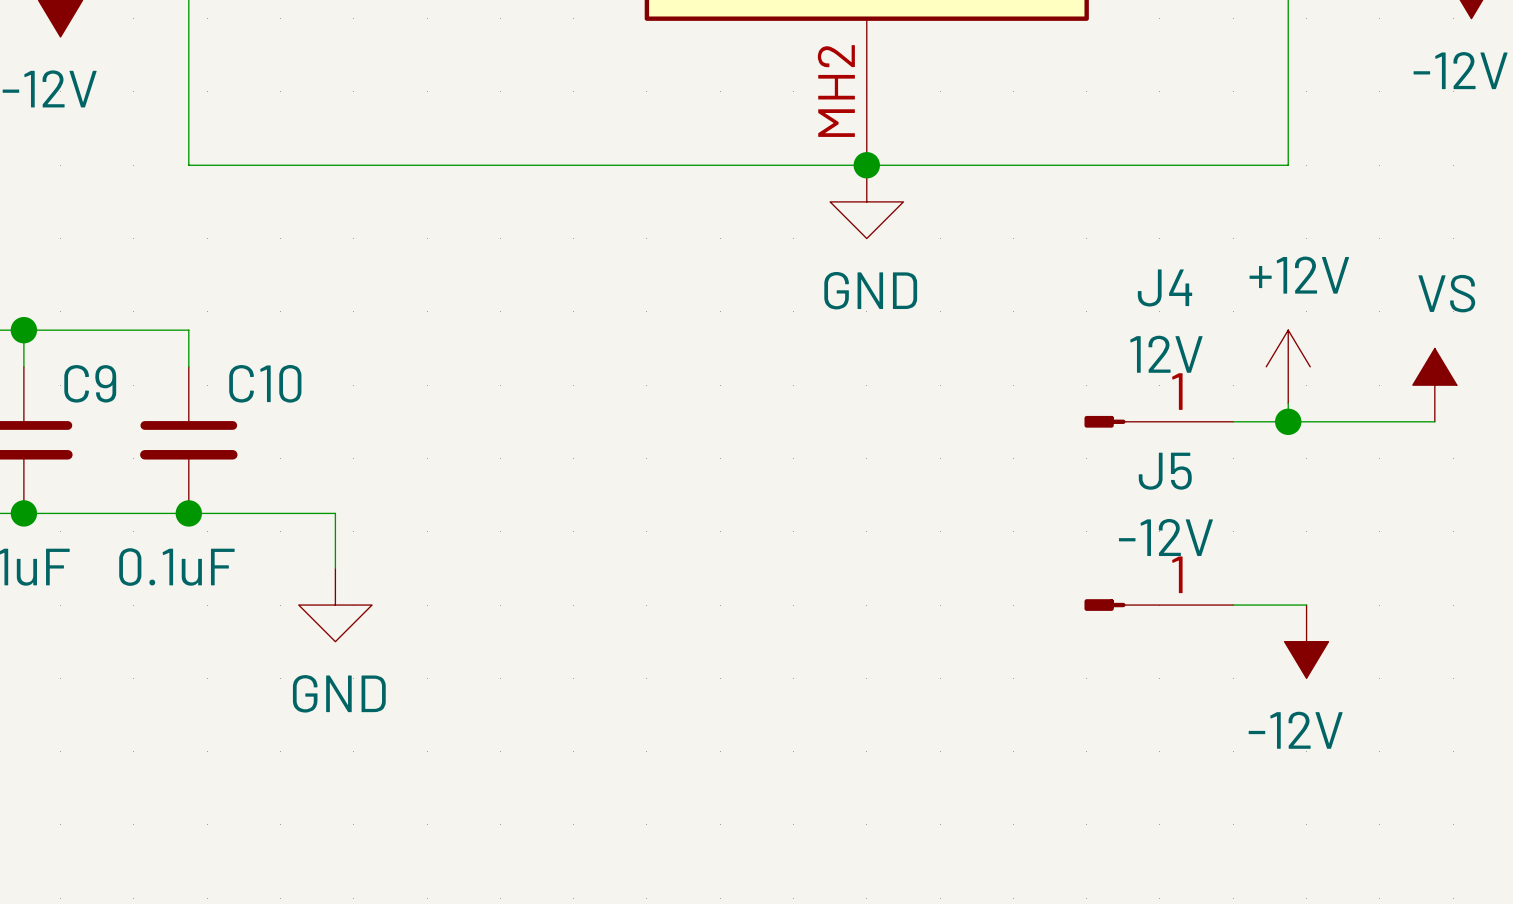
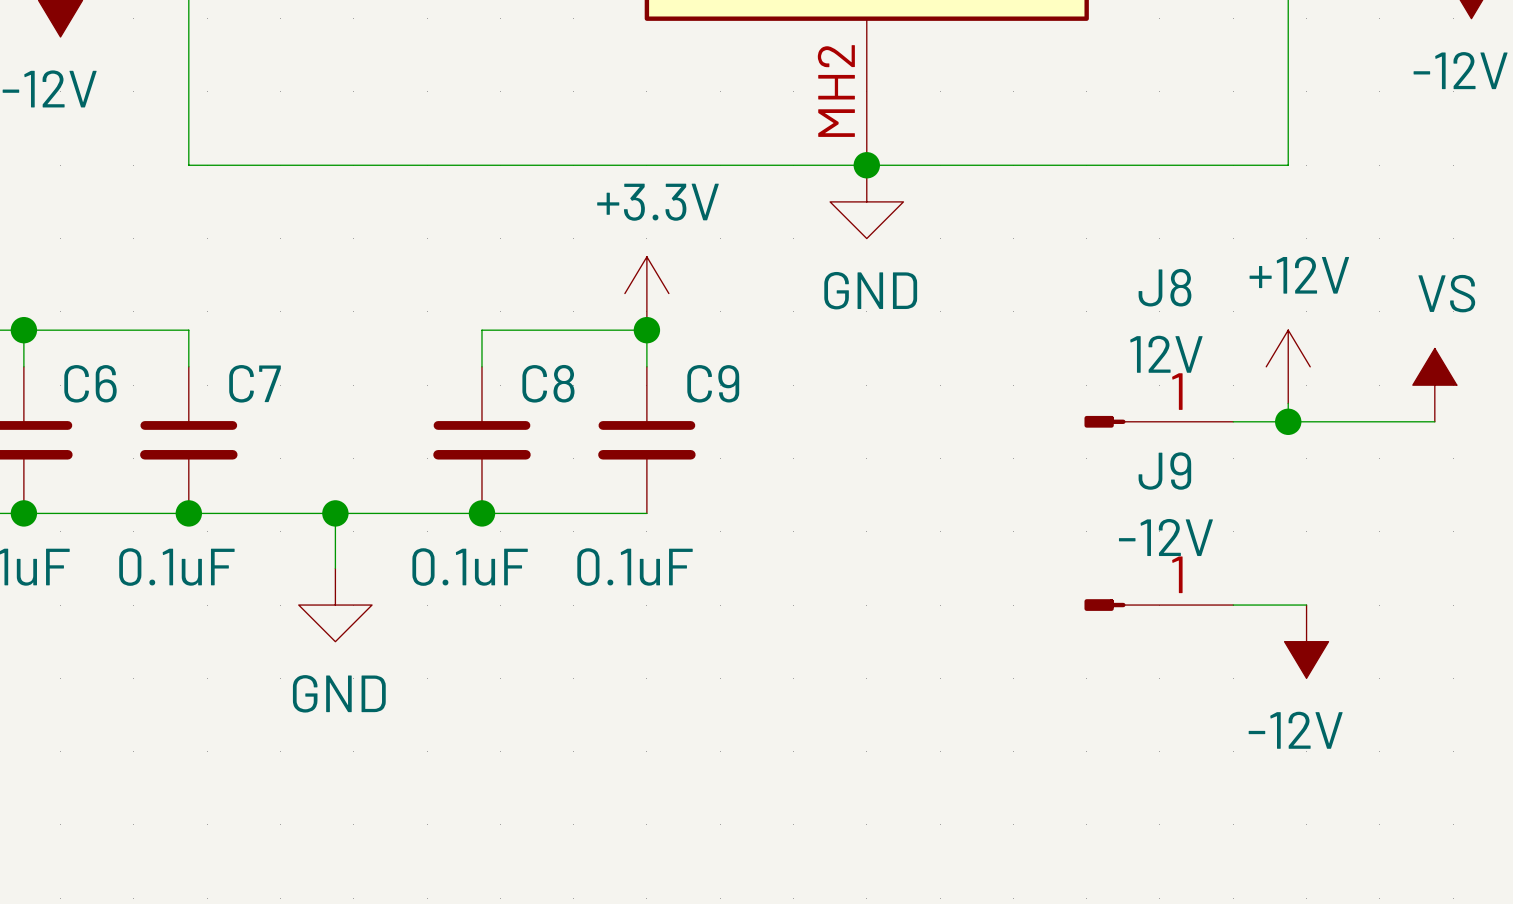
J4 name: J4 (1164, 287) -> J8 (1164, 287)
power symbol: none -> +3.3V (646, 293)
junction: none -> (646, 330)
wire: none -> (481, 366) (481, 330) (646, 330) (646, 366)
C9 name: C9 (90, 383) -> C6 (90, 383)
C10 name: C10 (265, 383) -> C7 (255, 383)
C8: none -> 0.1uF (481, 440)
C9: none -> 0.1uF (646, 440)
J5 name: J5 (1165, 471) -> J9 (1164, 471)
wire: none -> (335, 513) (646, 513)
junction: none -> (335, 513)
junction: none -> (481, 513)

